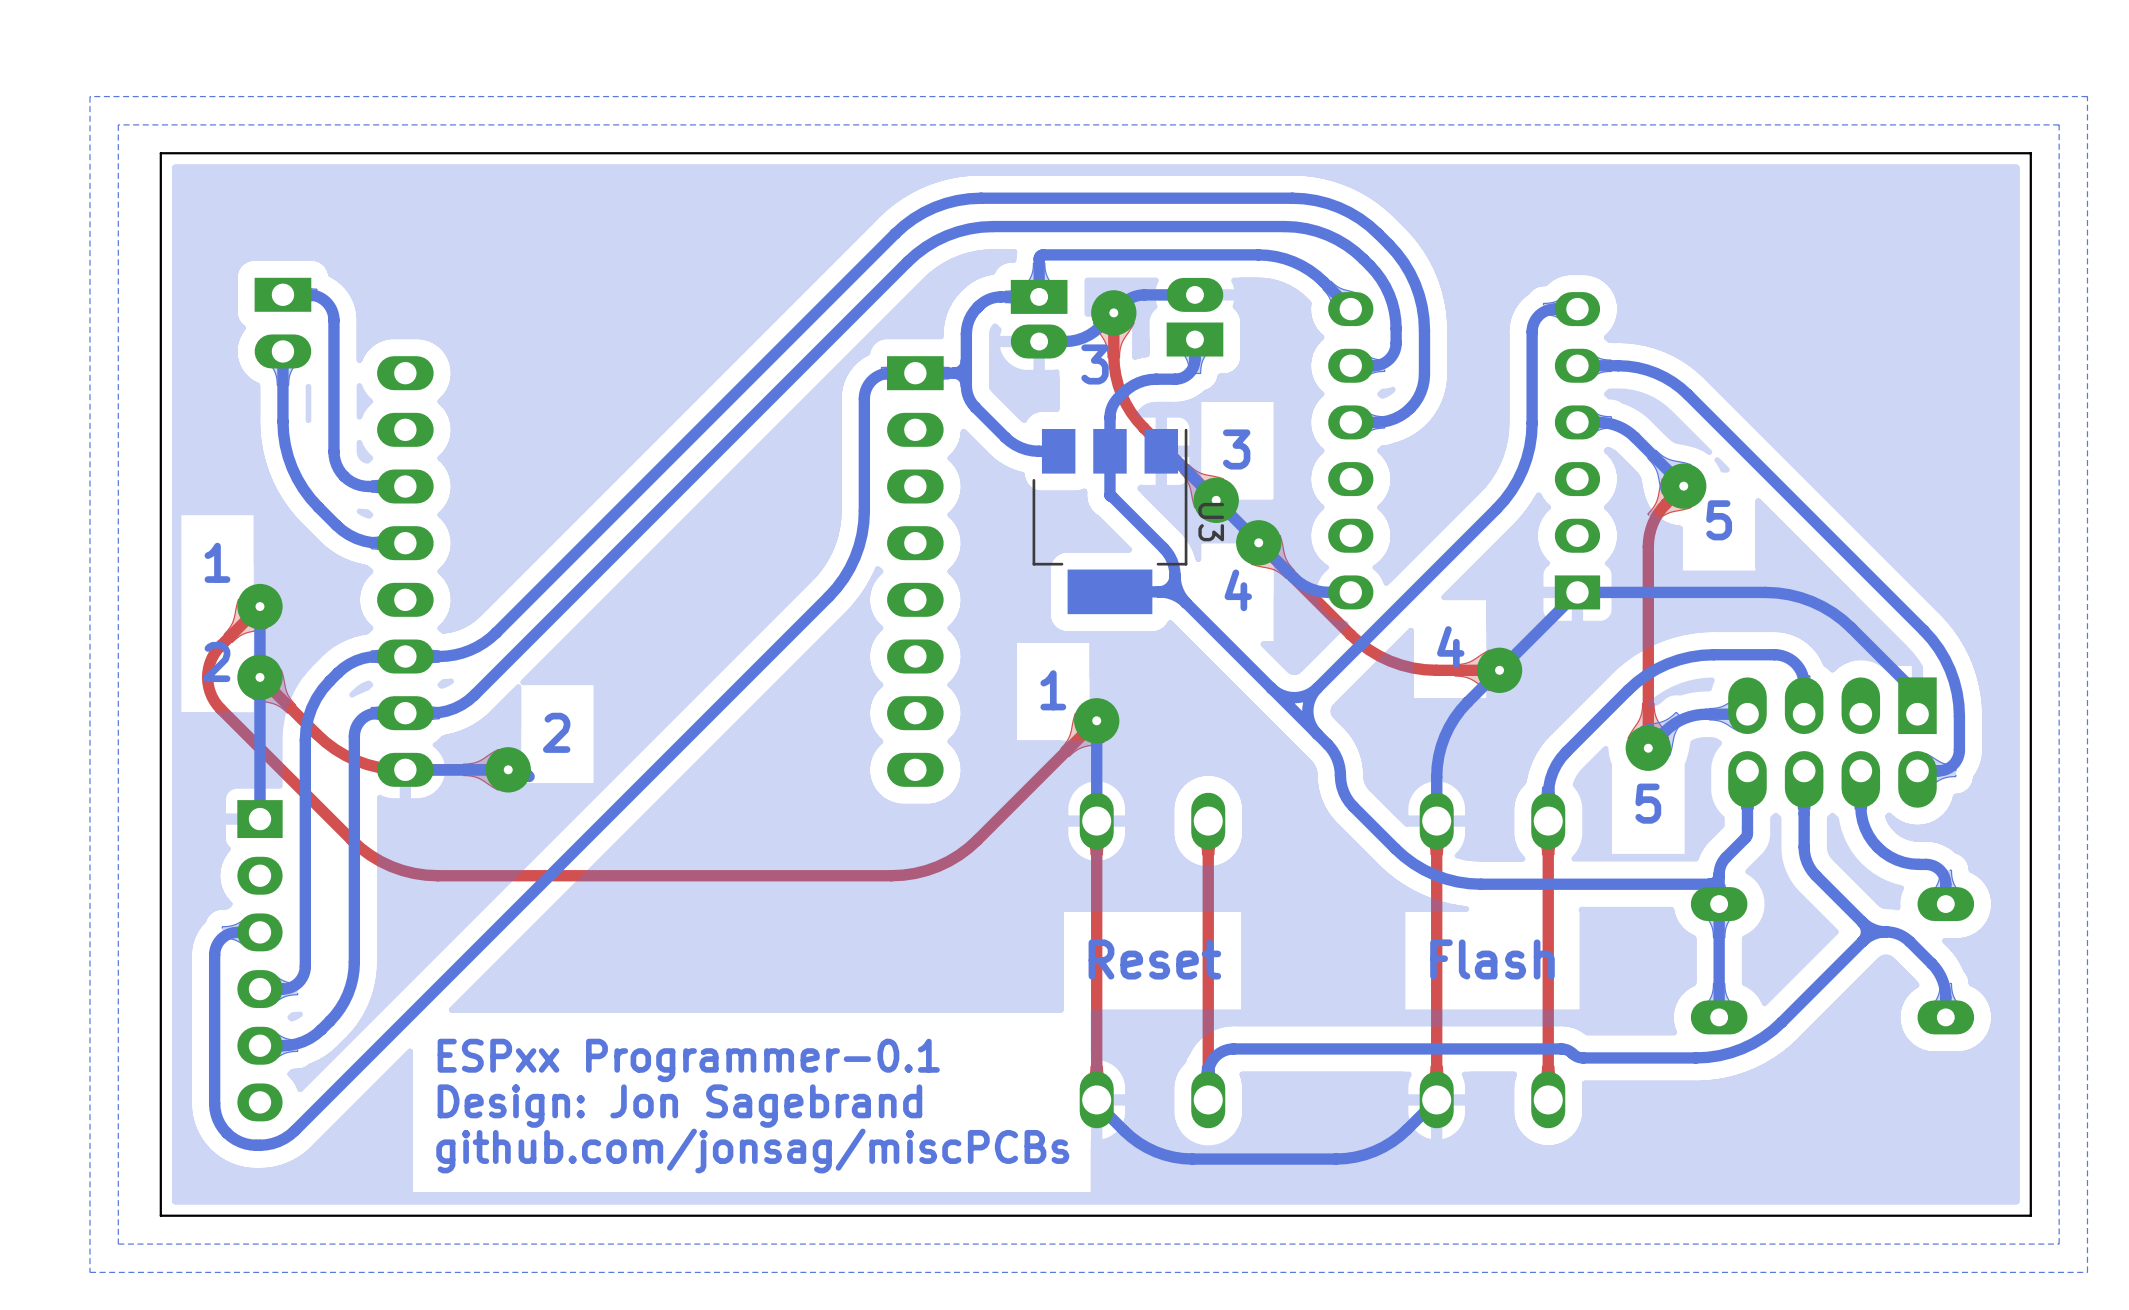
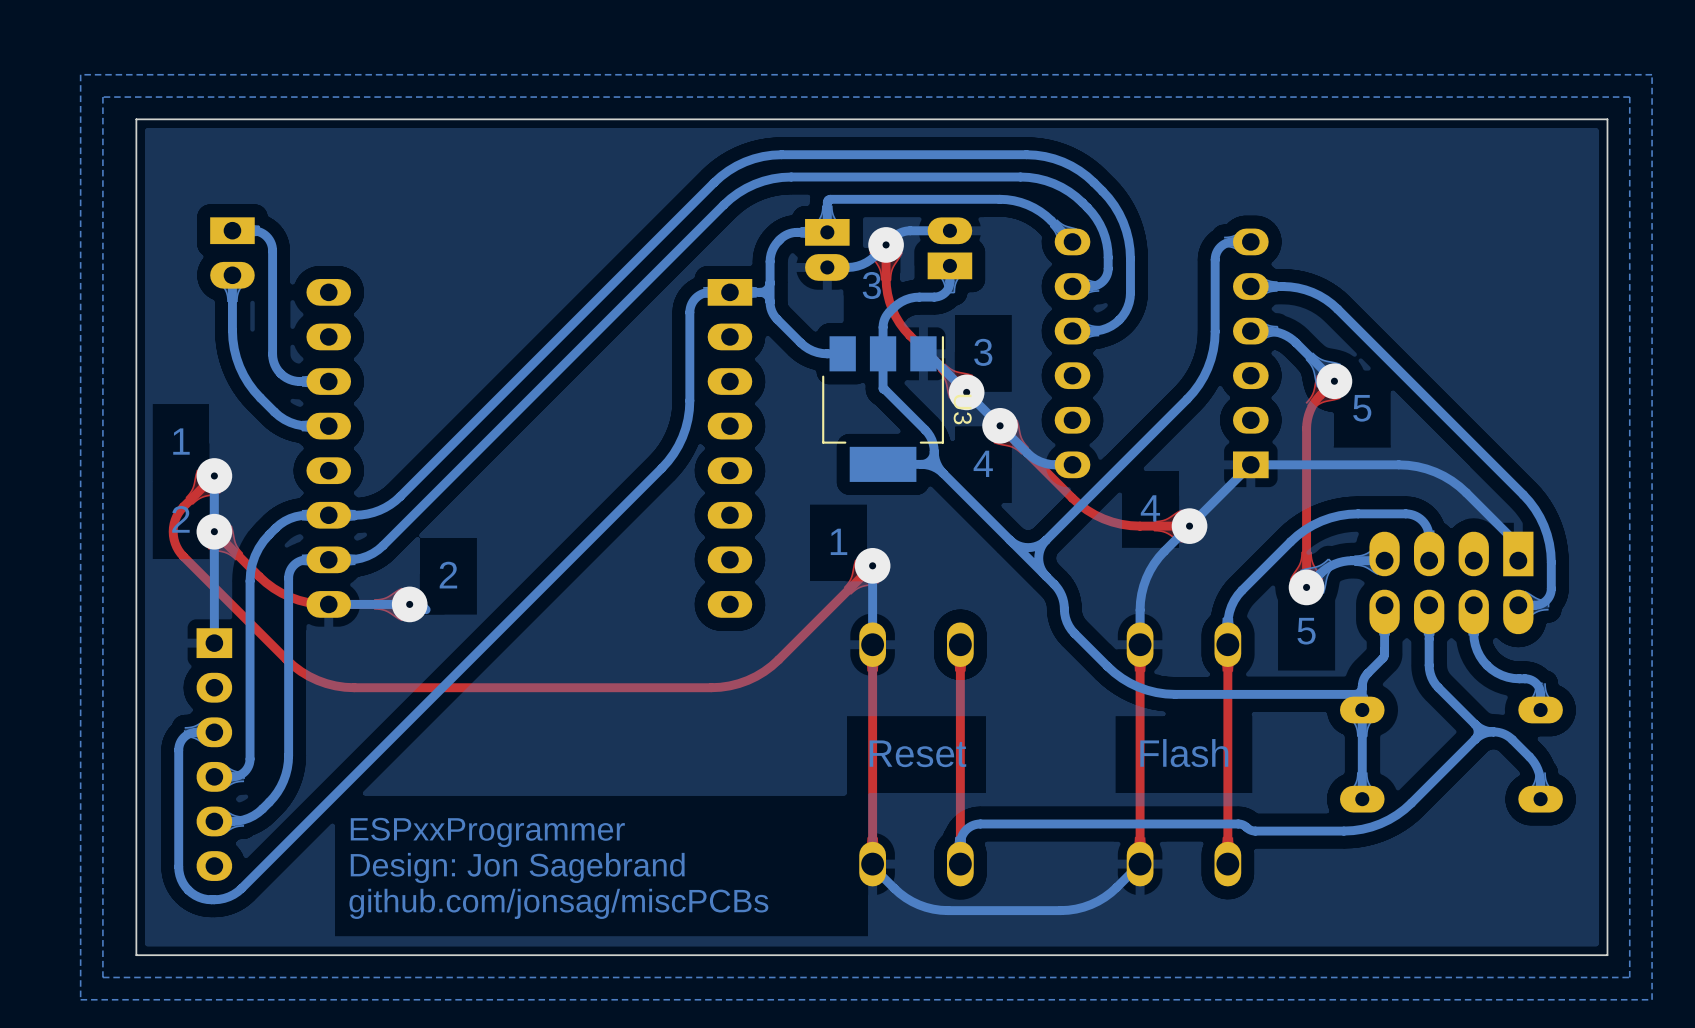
text: ESPxx Programmer-0.1 (688, 1060) -> ESPxxProgrammer (487, 832)

